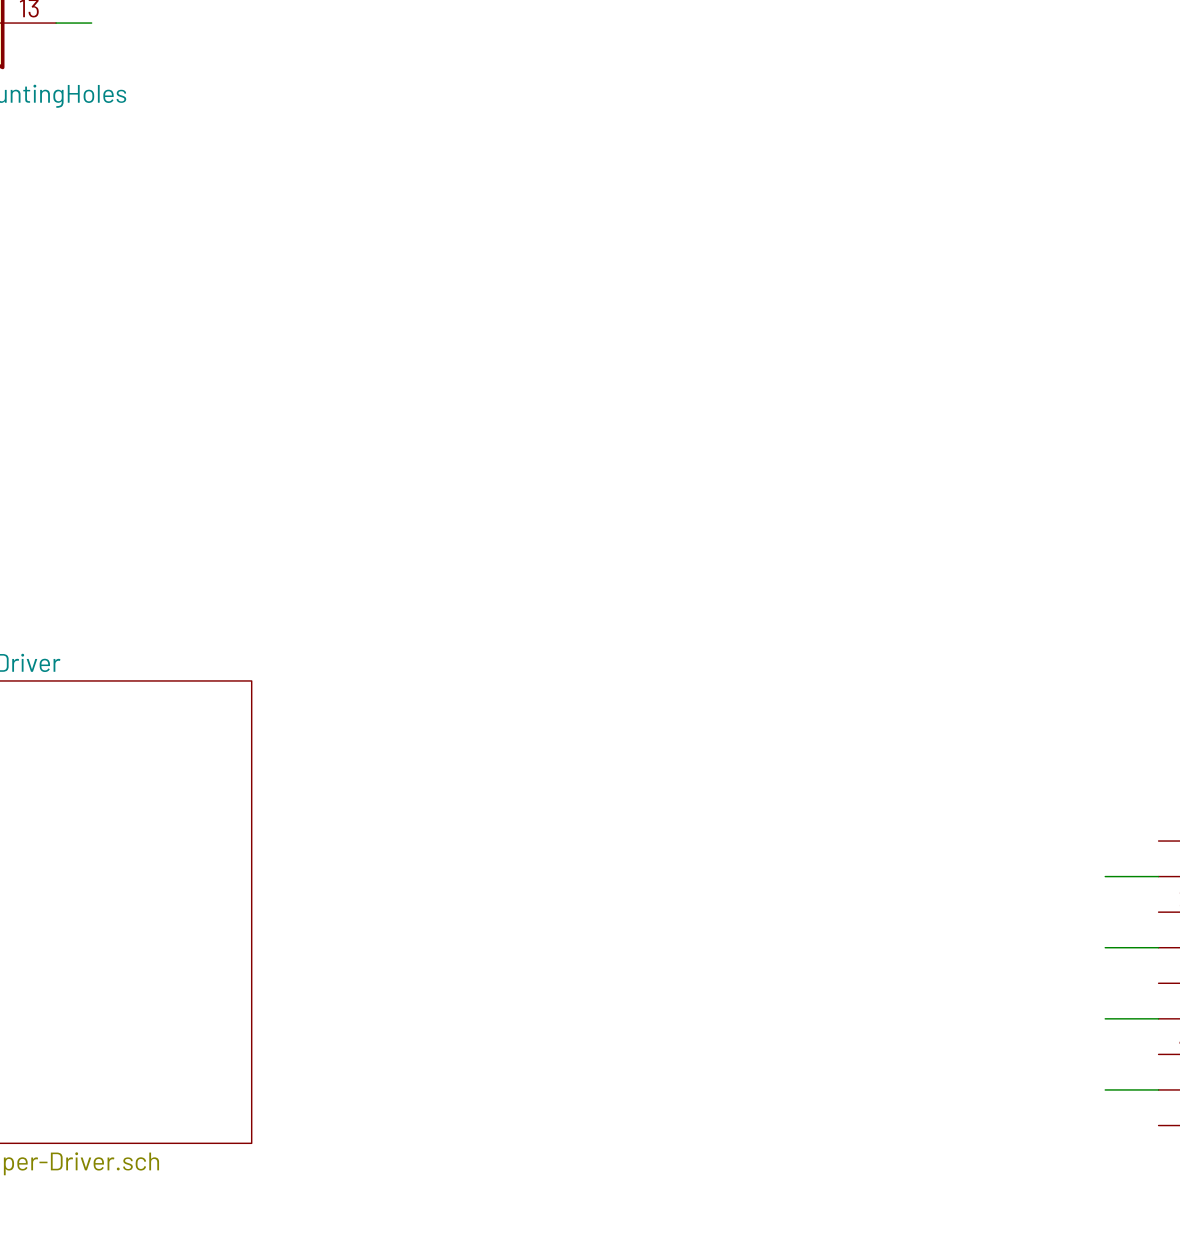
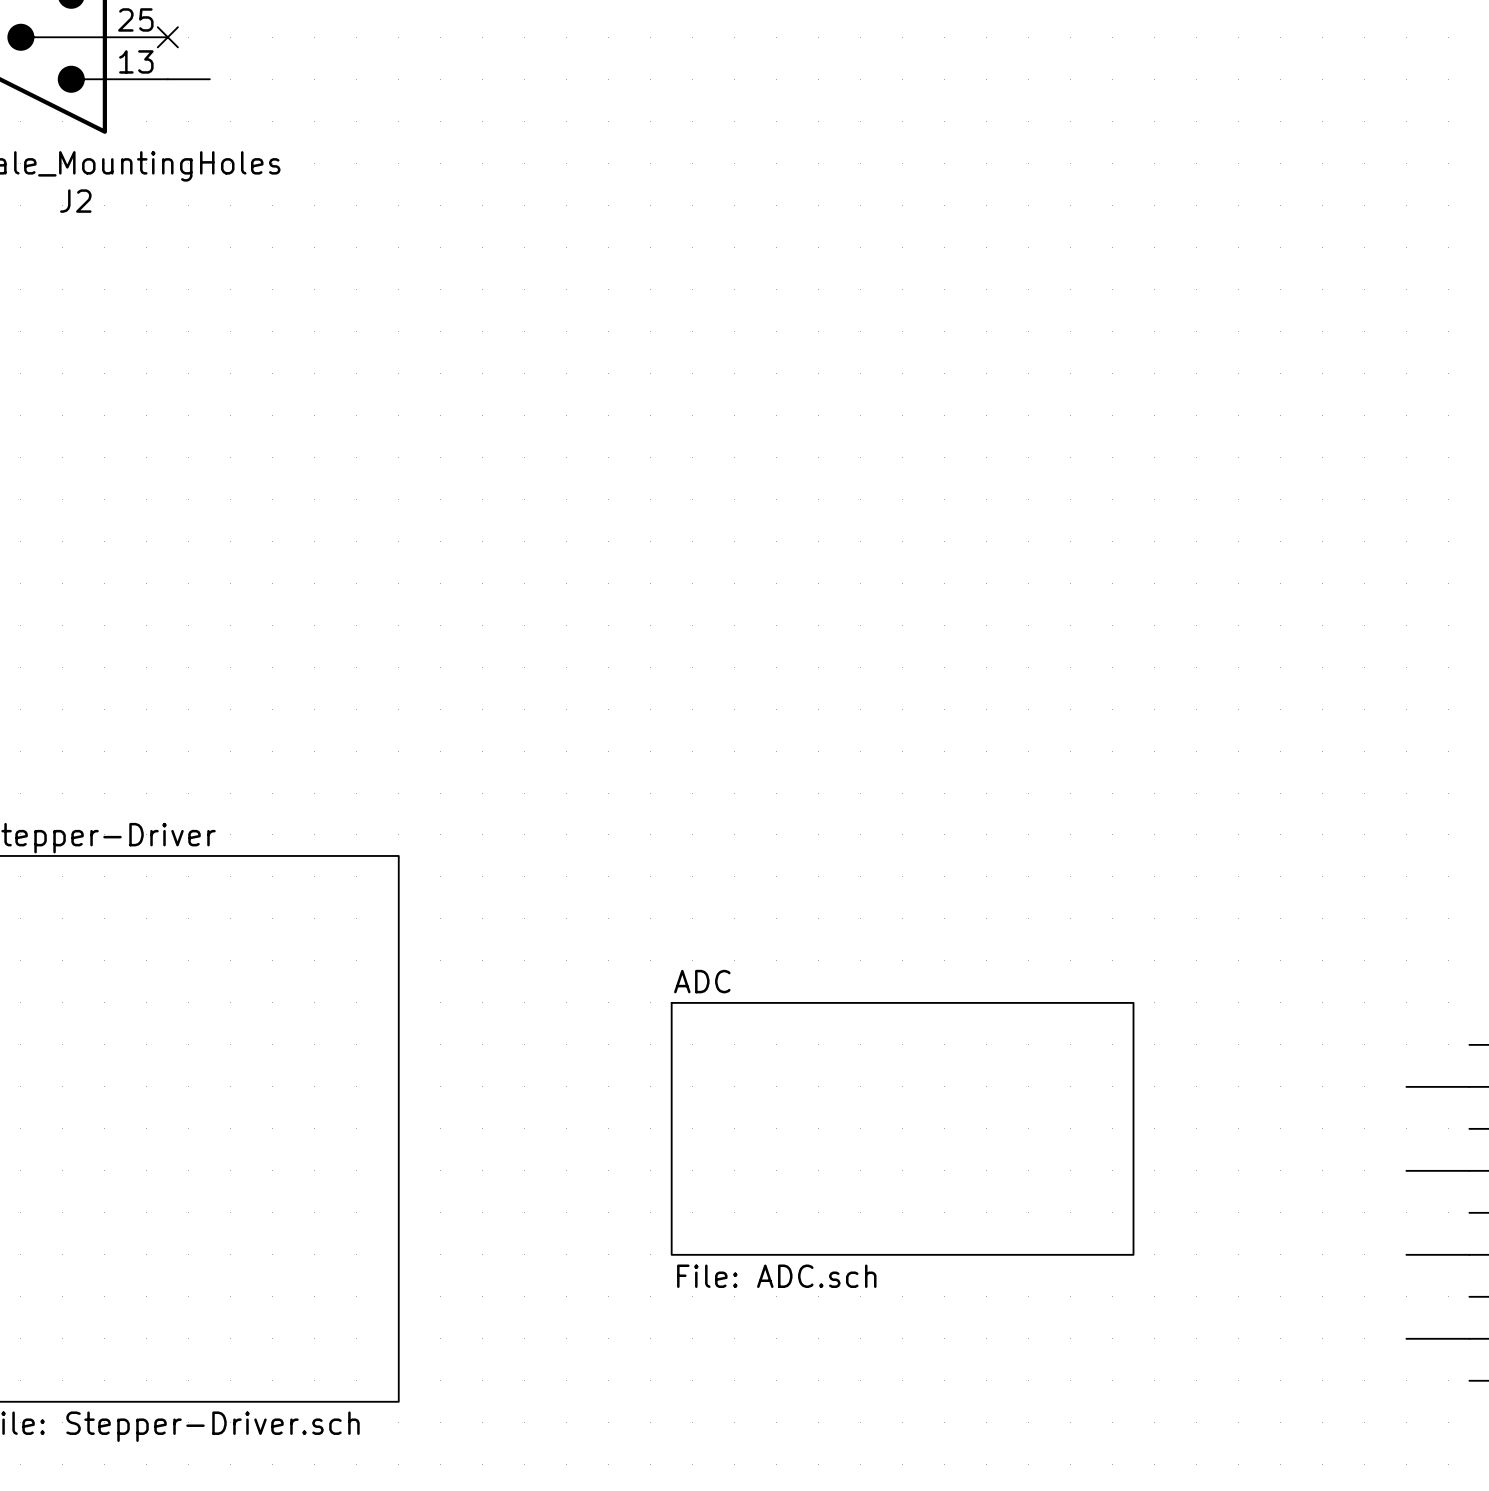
sheet ADC: none -> File: ADC.sch (902, 1128)

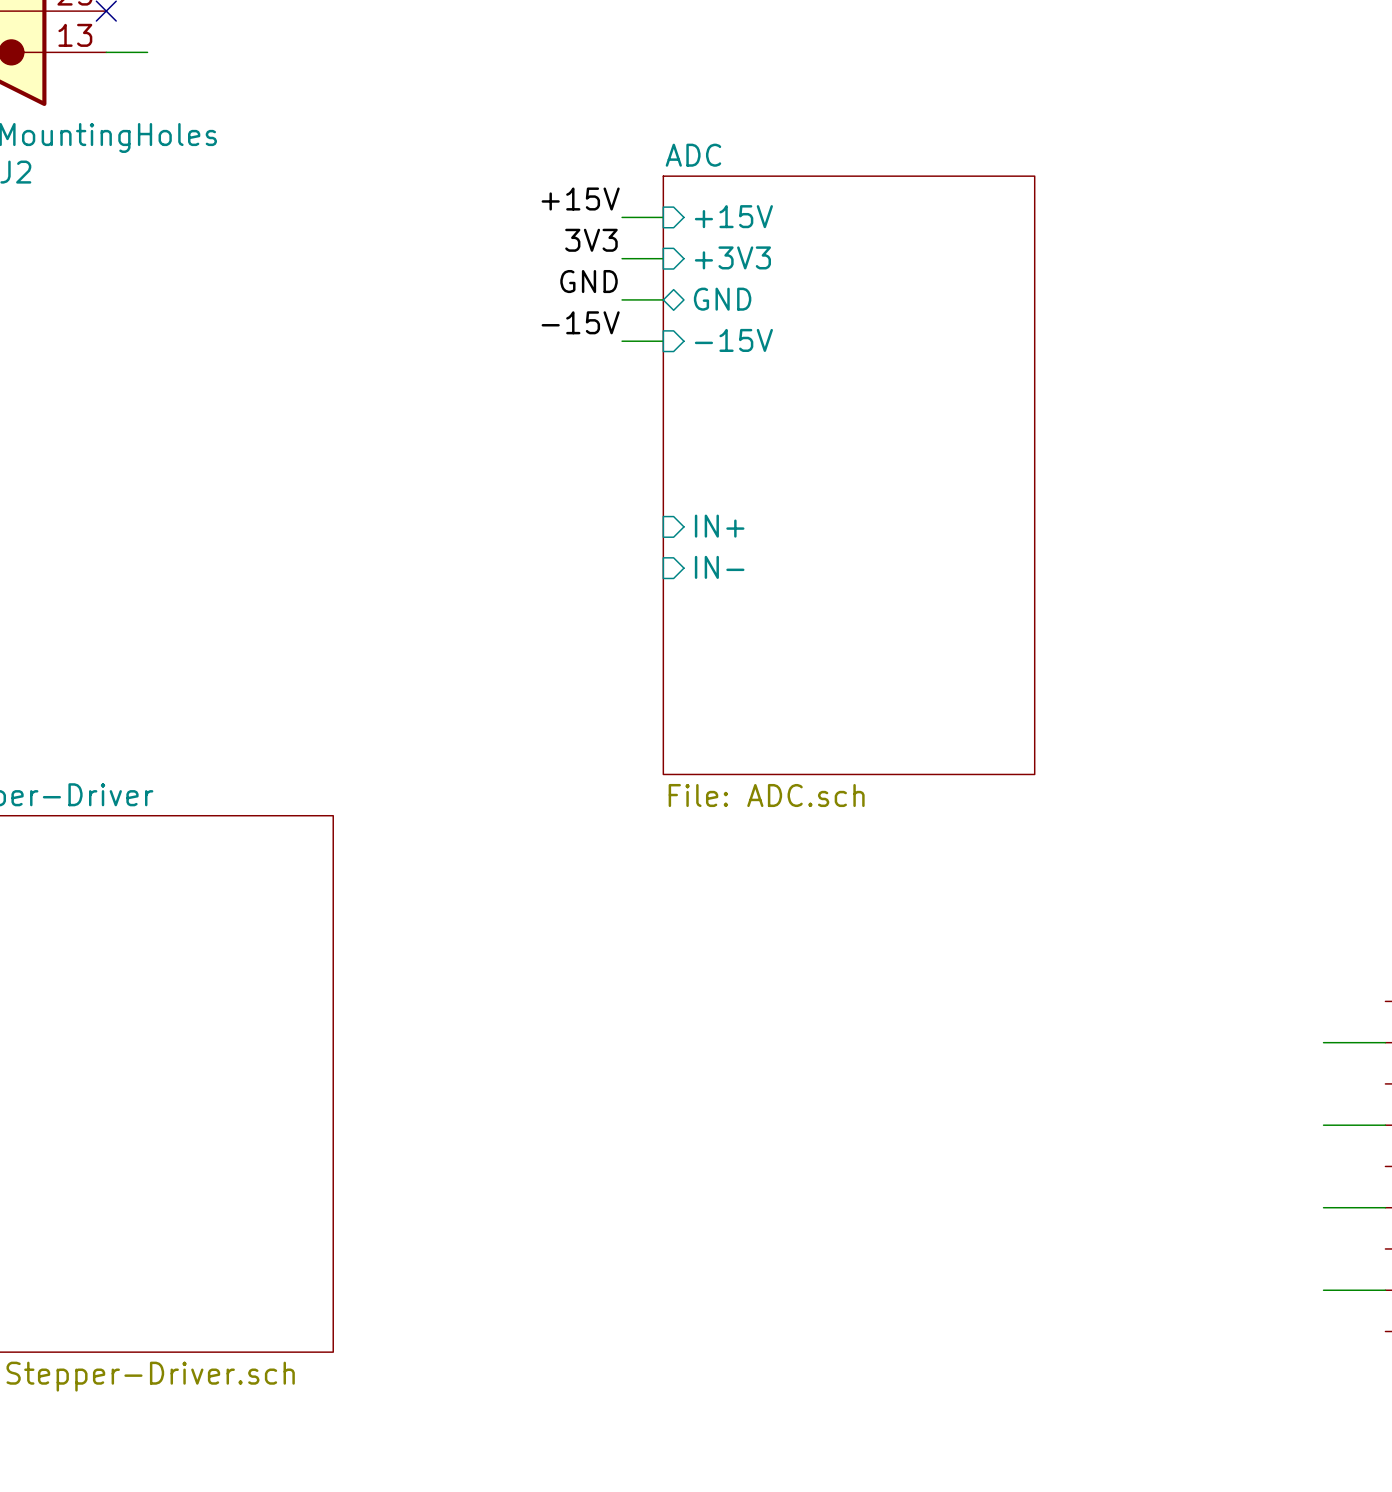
label: none -> +15V (580, 199)
sheet pin: none -> +15V (733, 216)
wire: none -> (622, 217) (663, 217)
label: none -> 3V3 (591, 240)
sheet pin: none -> +3V3 (732, 257)
wire: none -> (622, 258) (663, 258)
label: none -> GND (589, 281)
sheet pin: none -> GND (722, 299)
wire: none -> (622, 299) (663, 299)
label: none -> -15V (580, 322)
sheet pin: none -> -15V (733, 340)
wire: none -> (622, 341) (663, 341)
sheet ADC: none -> File: ADC.sch (849, 475)
sheet pin: none -> IN+ (719, 526)
sheet pin: none -> IN- (719, 567)
sheet ADC: File: ADC.sch (902, 1128) -> none

